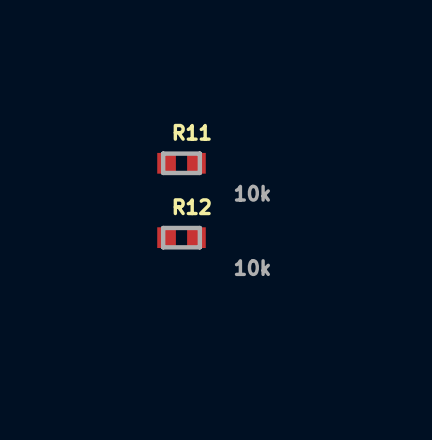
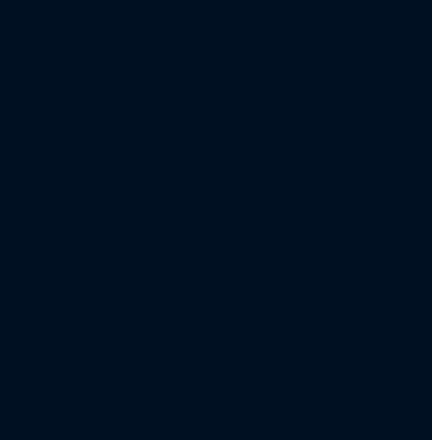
R11: 10k (181, 163) -> none
R12: 10k (181, 237) -> none

